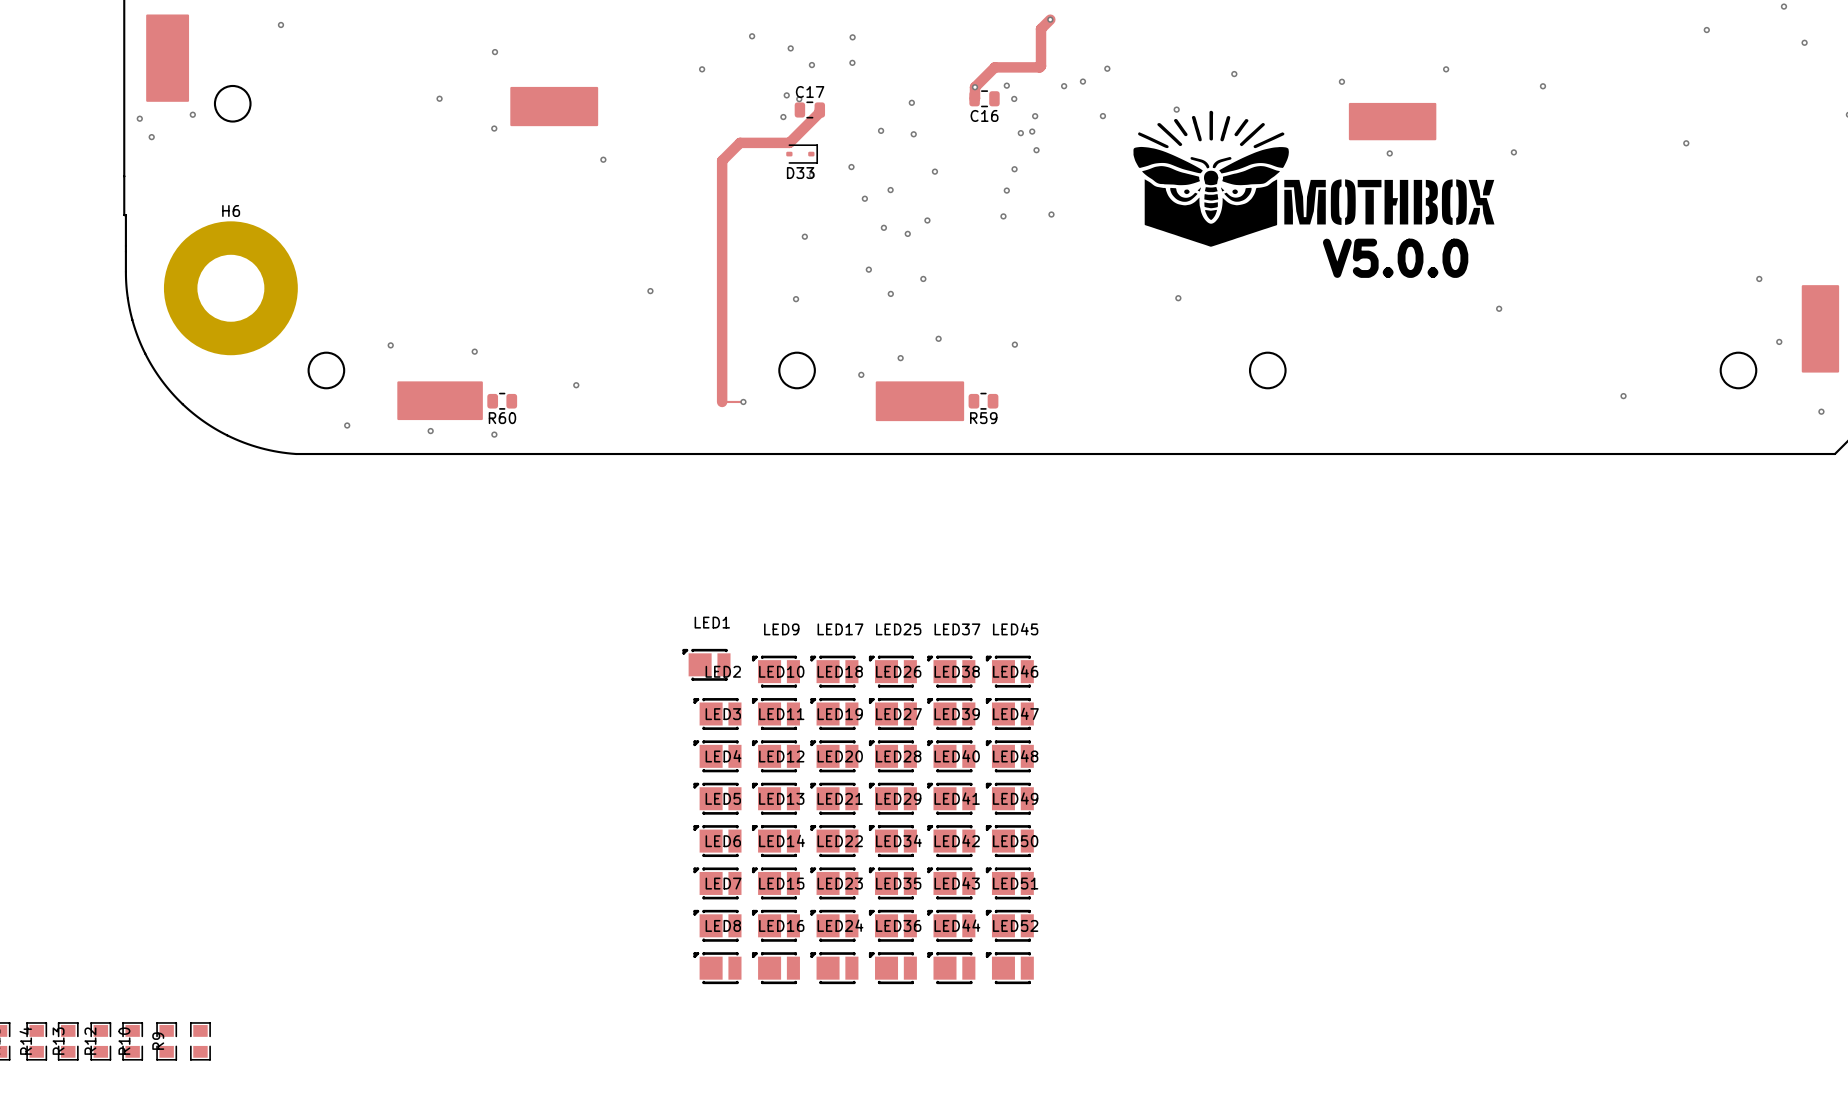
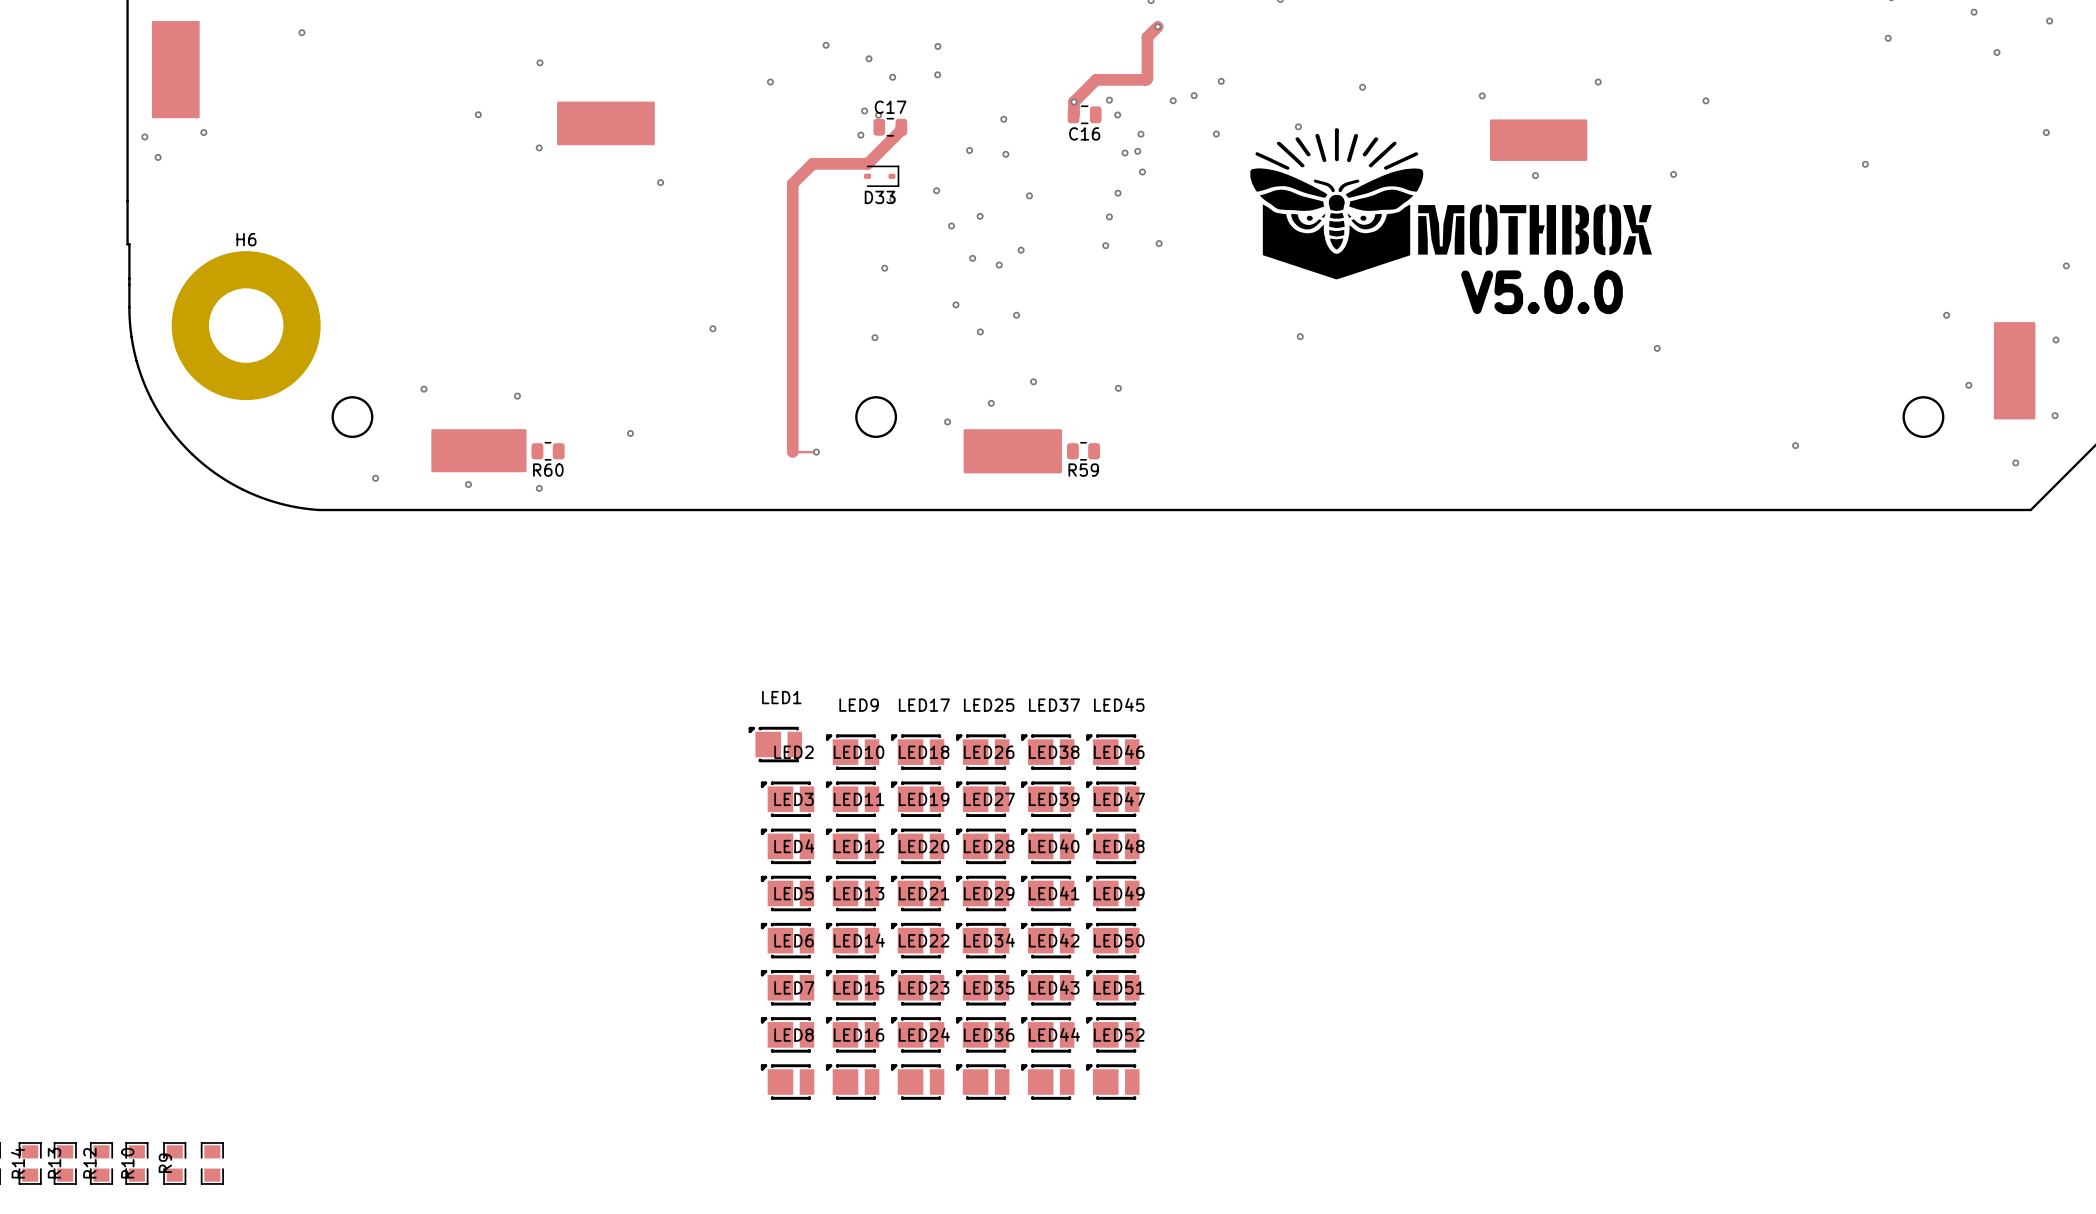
round board edge: [213, 84, 252, 123] -> none
round board edge: [1248, 351, 1287, 390] -> none

